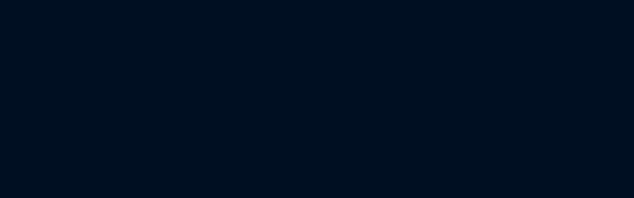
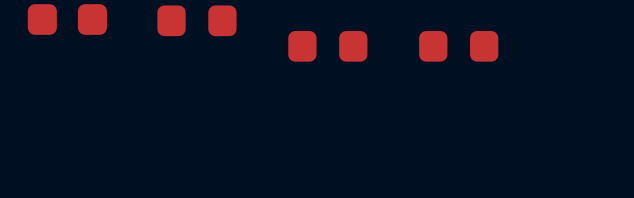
part: none -> (67, 19)
part: none -> (196, 20)
part: none -> (327, 46)
part: none -> (458, 46)

